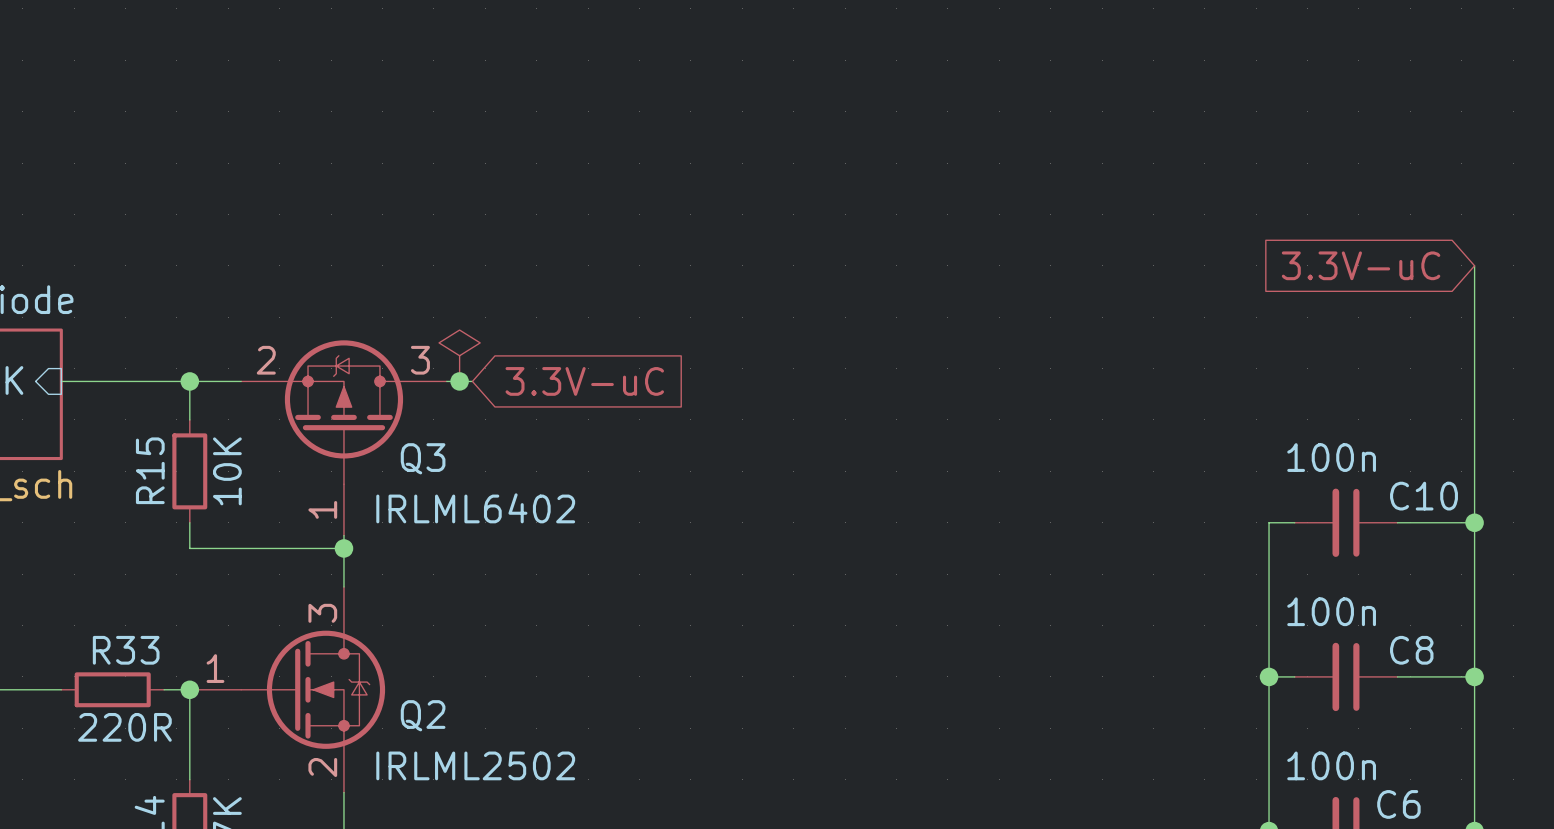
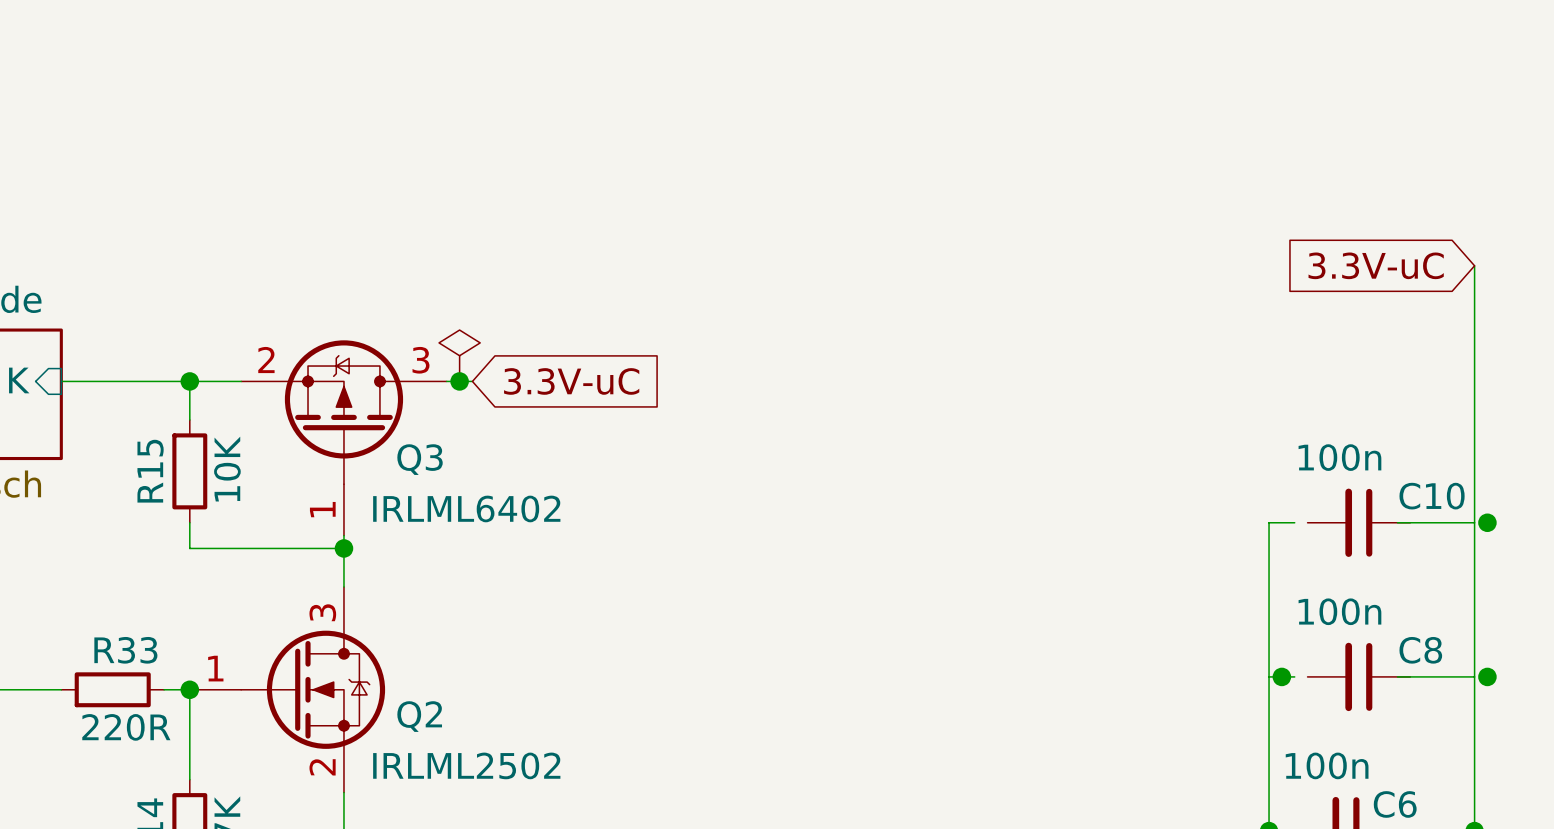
C10 position: (1346, 522) -> (1358, 522)
junction position: (1474, 522) -> (1487, 522)
junction position: (1269, 676) -> (1281, 676)
C8 position: (1346, 676) -> (1358, 676)
junction position: (1474, 676) -> (1487, 676)

